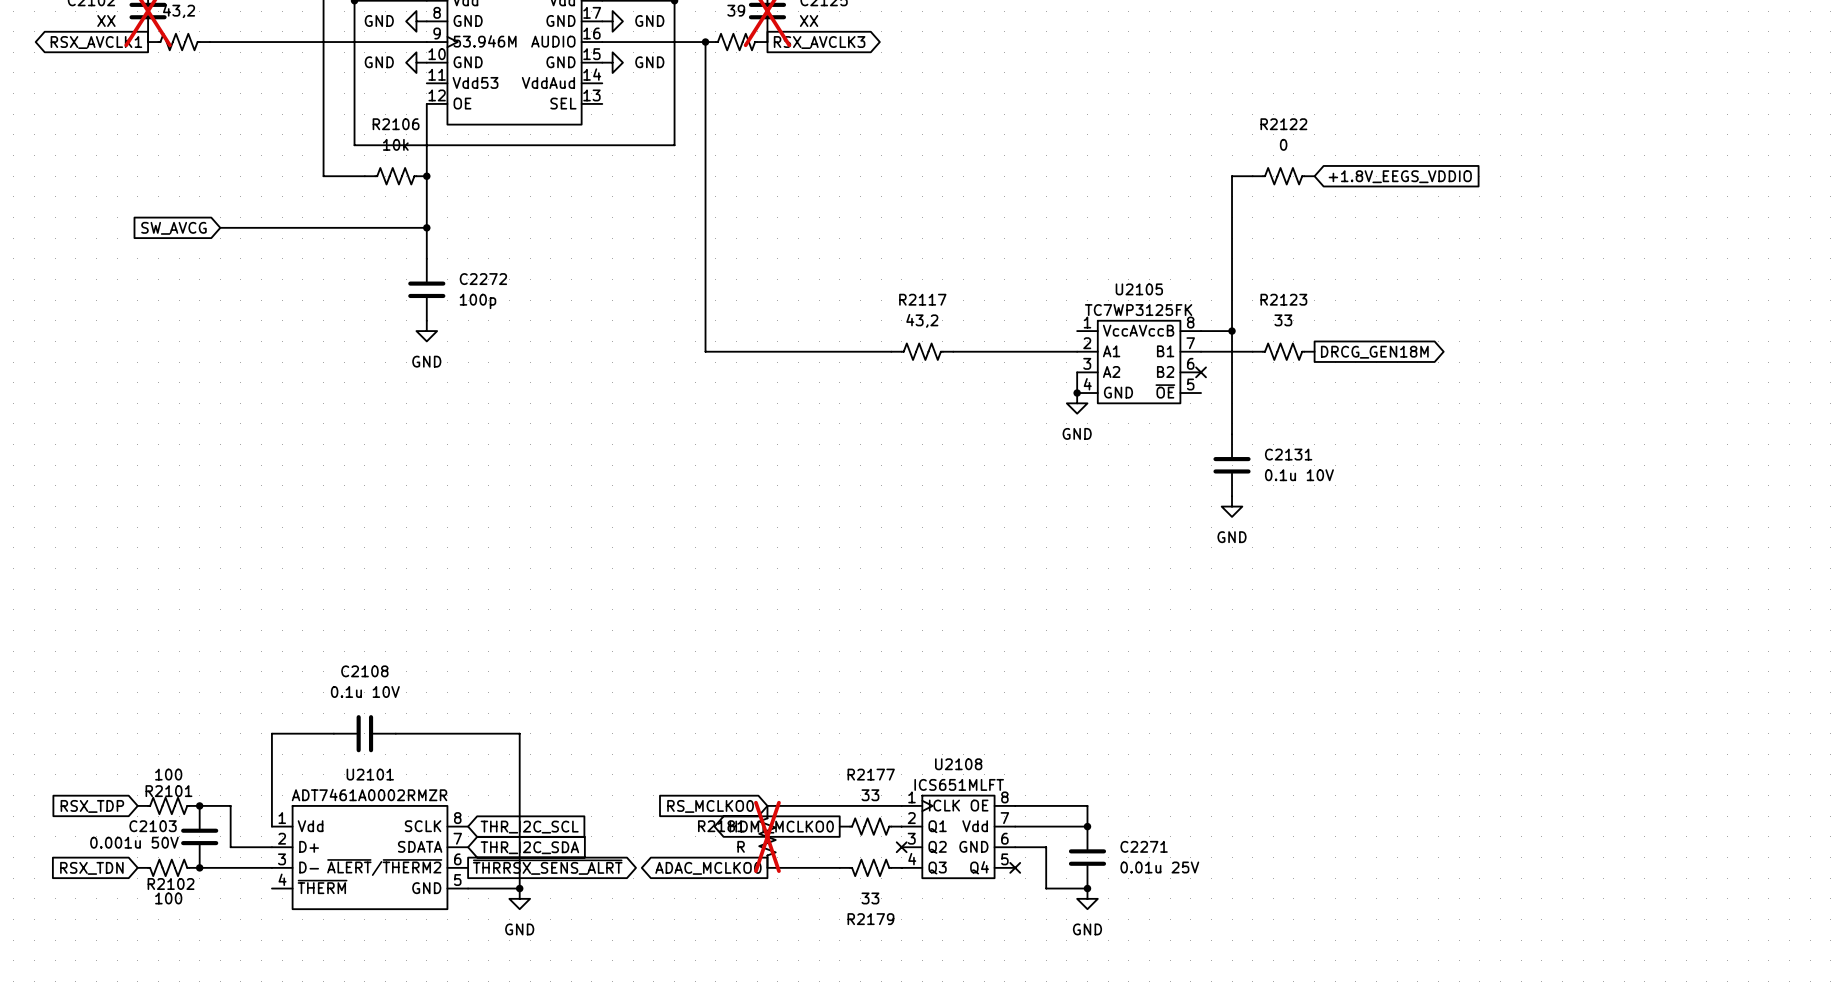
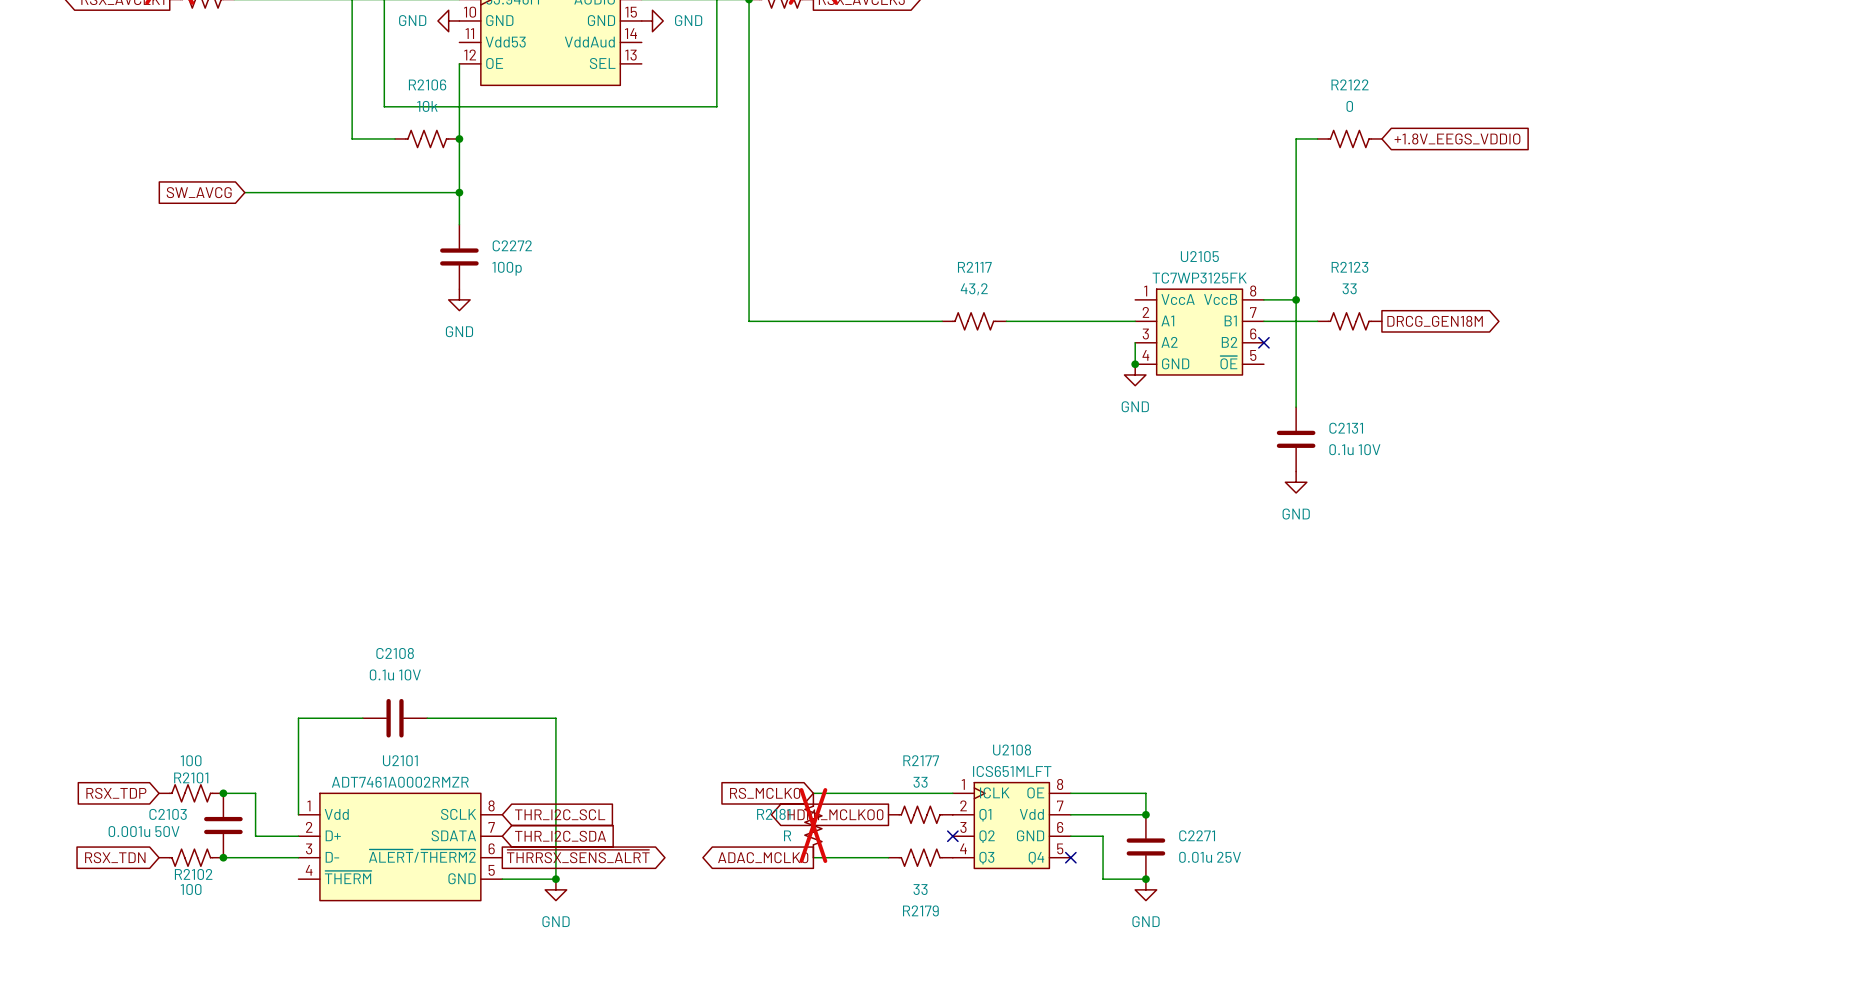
global label: RS_MCLKO0 (710, 806) -> RS_MCLK0 (765, 793)
global label: ADAC_MCLKO0 (708, 868) -> ADAC_MCLK0 (763, 857)

